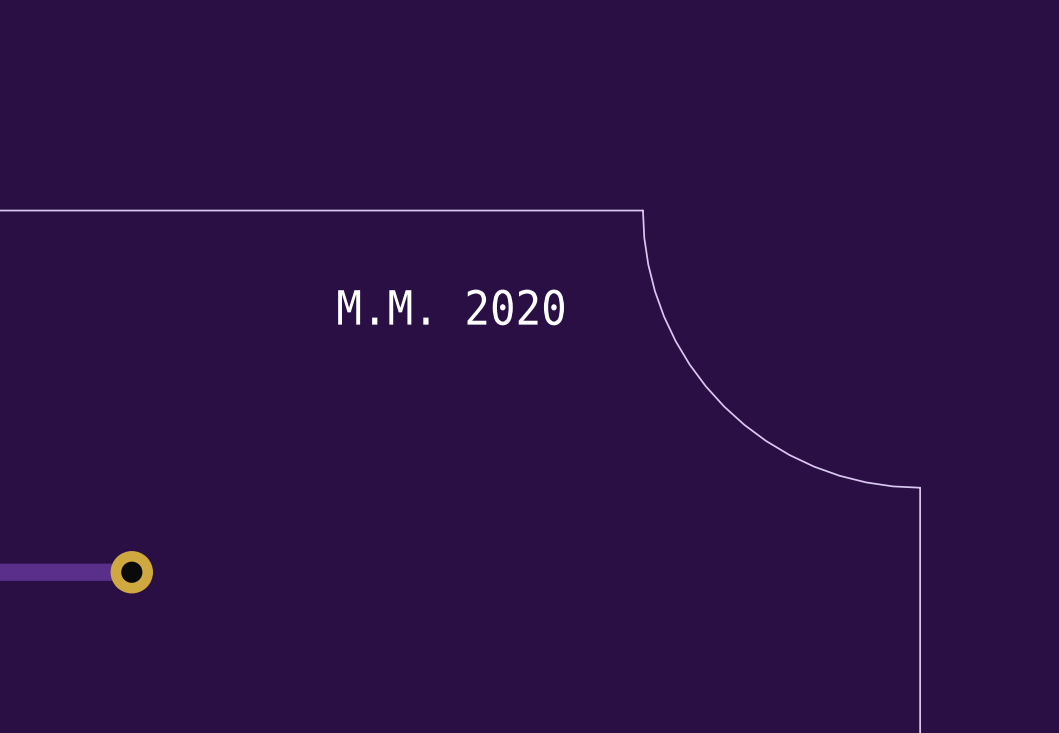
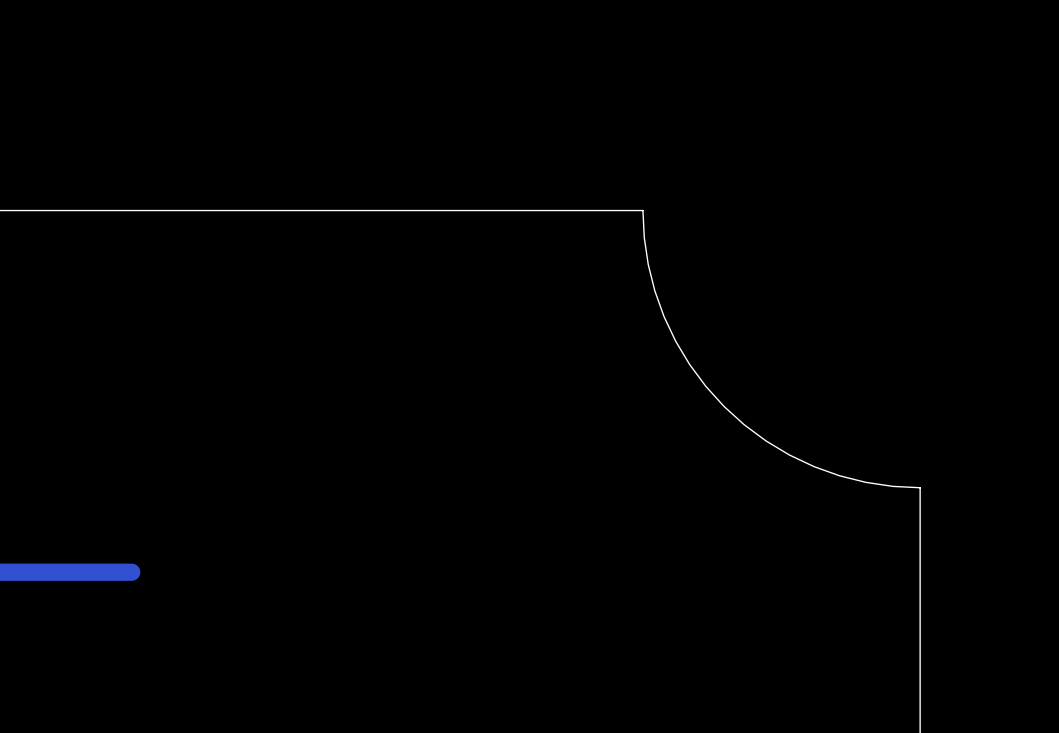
text: M.M. 2020 (451, 307) -> none
via: (131, 572) -> none

